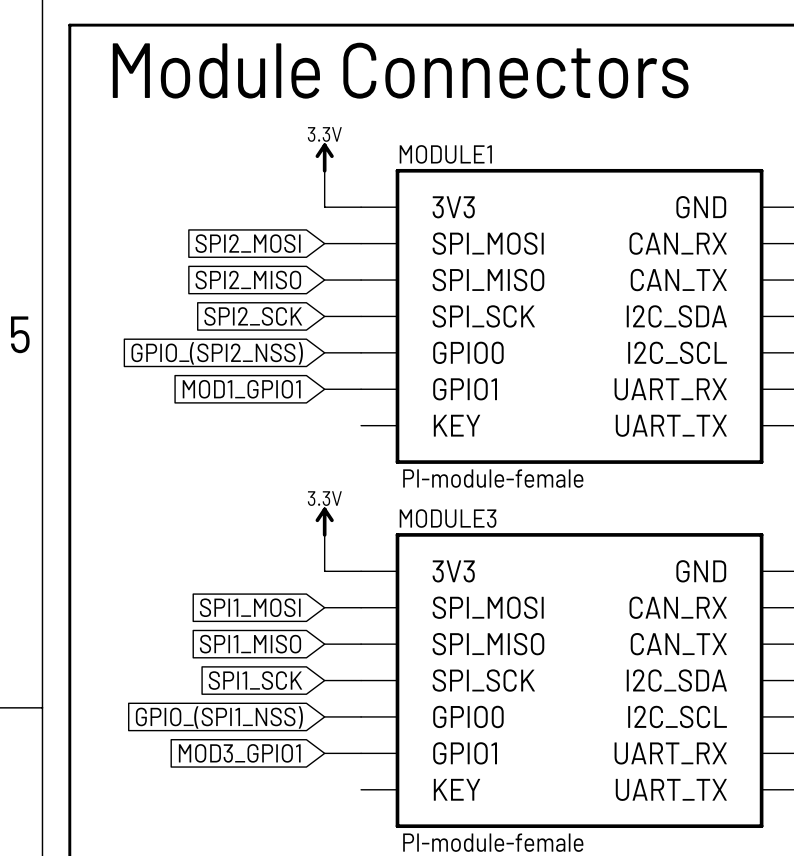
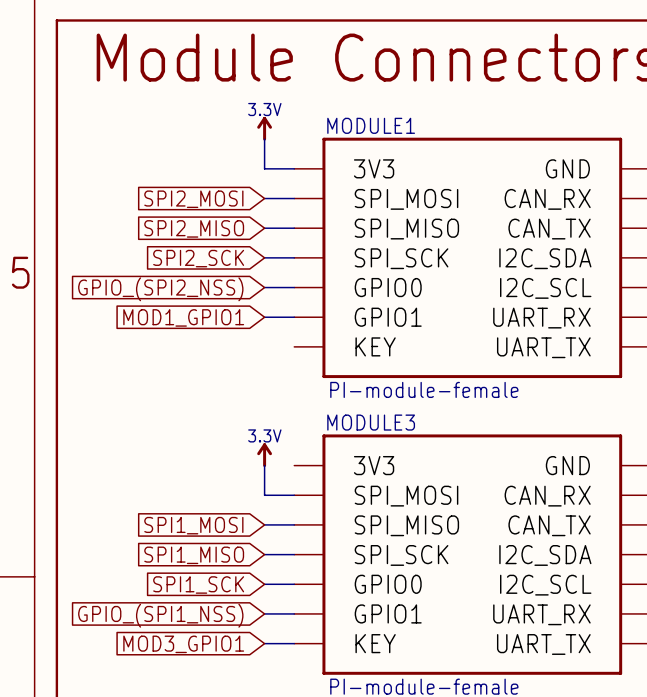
power symbol position: 3.3V (324, 522) -> 3.3V (264, 455)
wire: (324, 534) (324, 571) (361, 571) -> none
wire: none -> (264, 465) (264, 495)
global label: SPI1_MOSI (250, 607) -> none
global label: SPI1_MISO (250, 644) -> SPI1_MOSI (193, 525)
global label: SPI1_SCK (255, 680) -> SPI1_MISO (194, 555)
global label: GPIO_(SPI1_NSS) (219, 717) -> SPI1_SCK (198, 584)
global label: MOD3_GPIO1 (239, 753) -> GPIO_(SPI1_NSS) (160, 615)
global label: none -> MOD3_GPIO1 (183, 644)
wire: none -> (264, 643) (294, 643)

